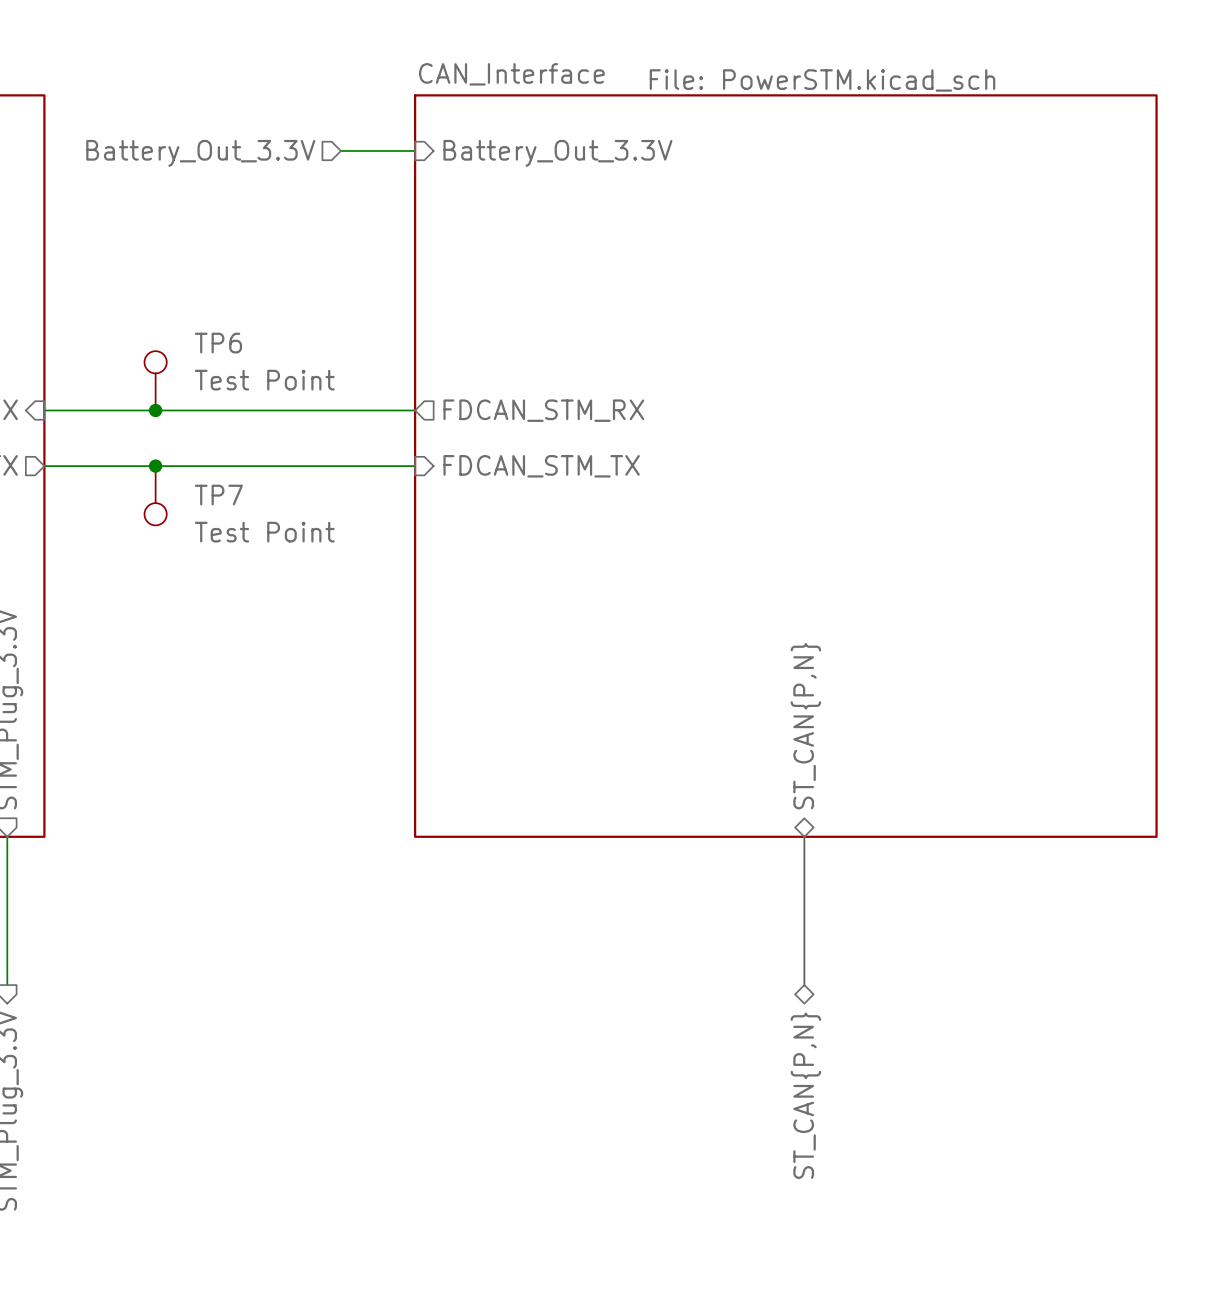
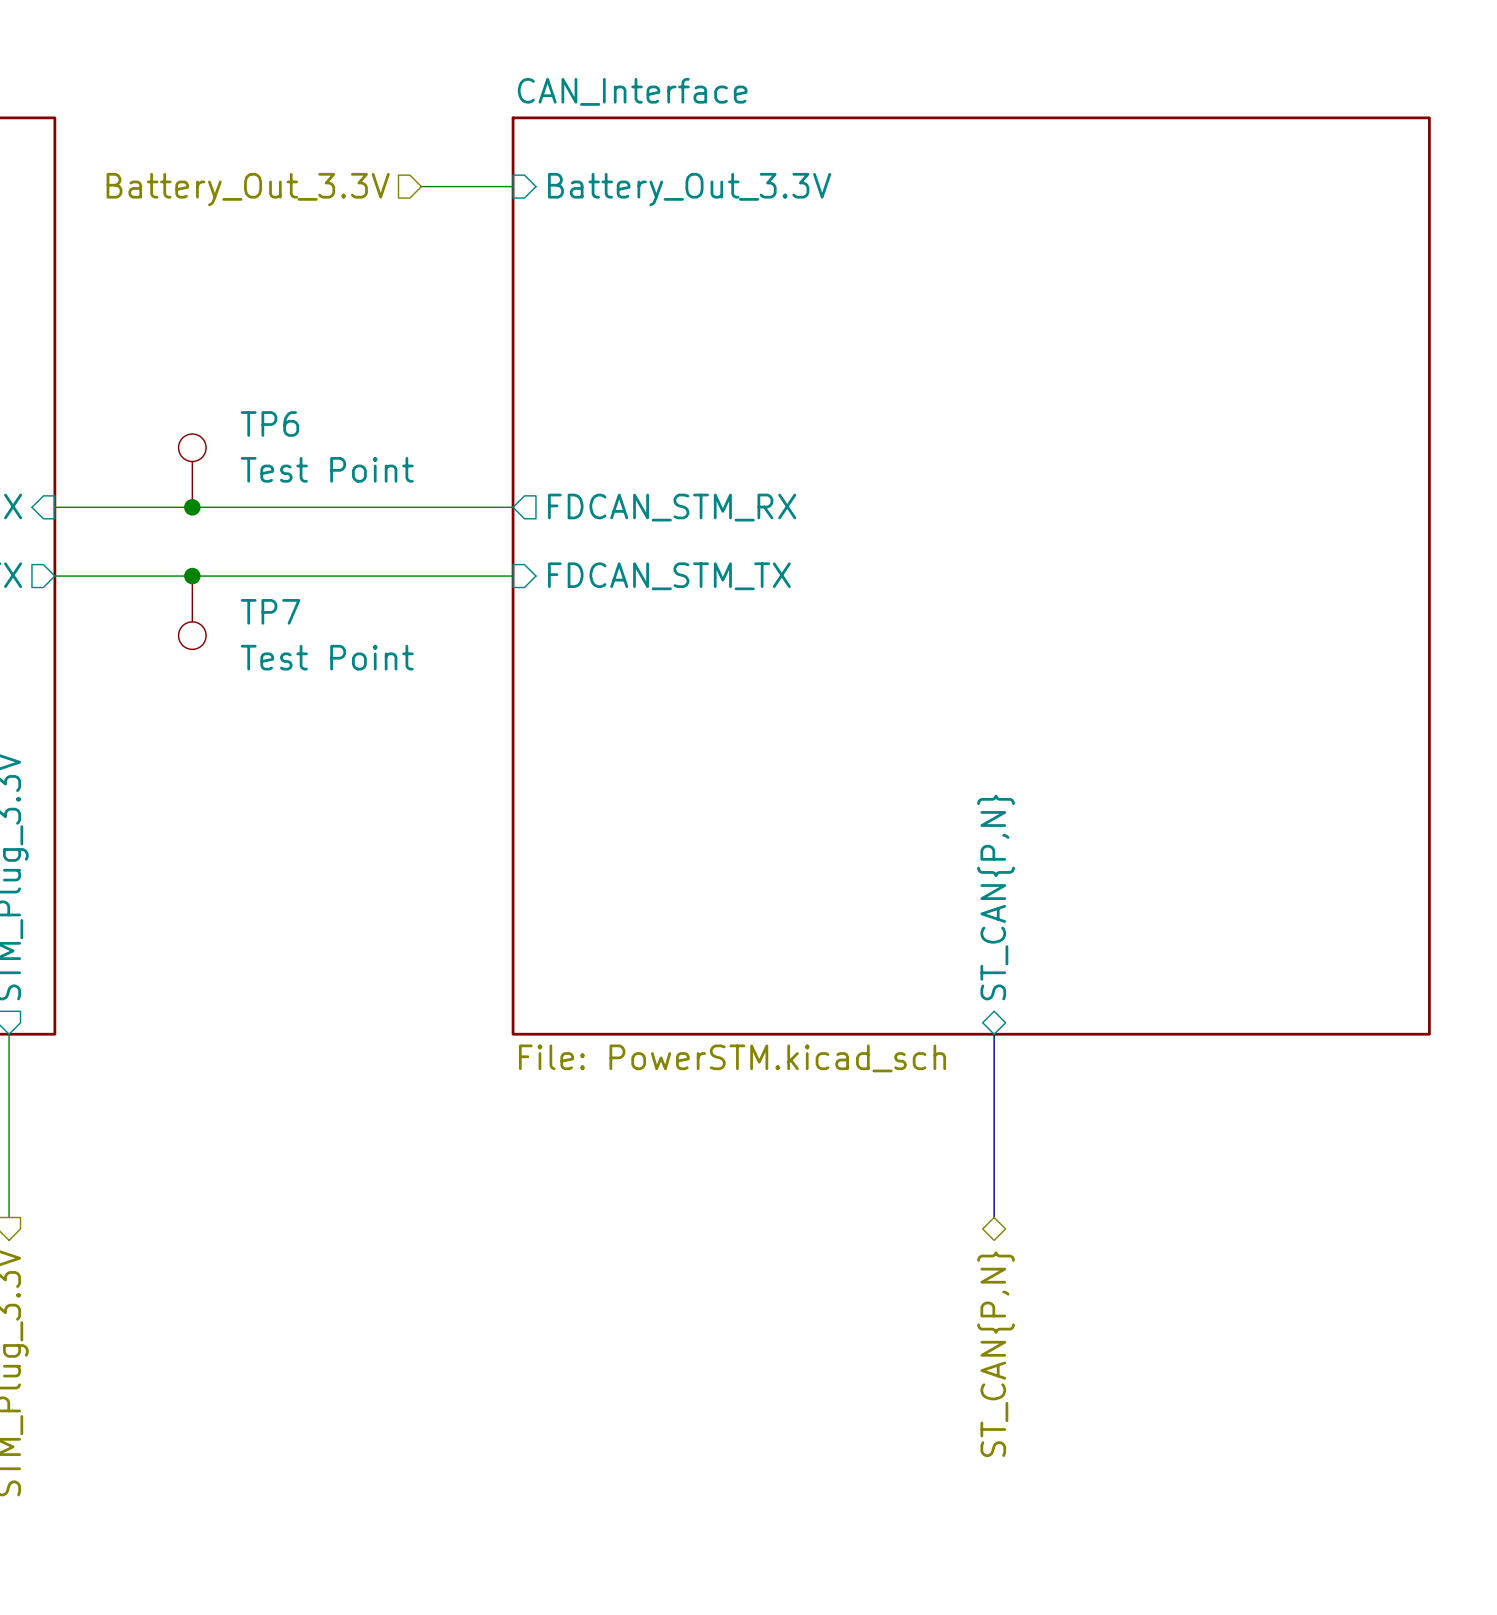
sheet CAN_Interface value position: File: PowerSTM.kicad_sch (822, 80) -> File: PowerSTM.kicad_sch (732, 1058)

